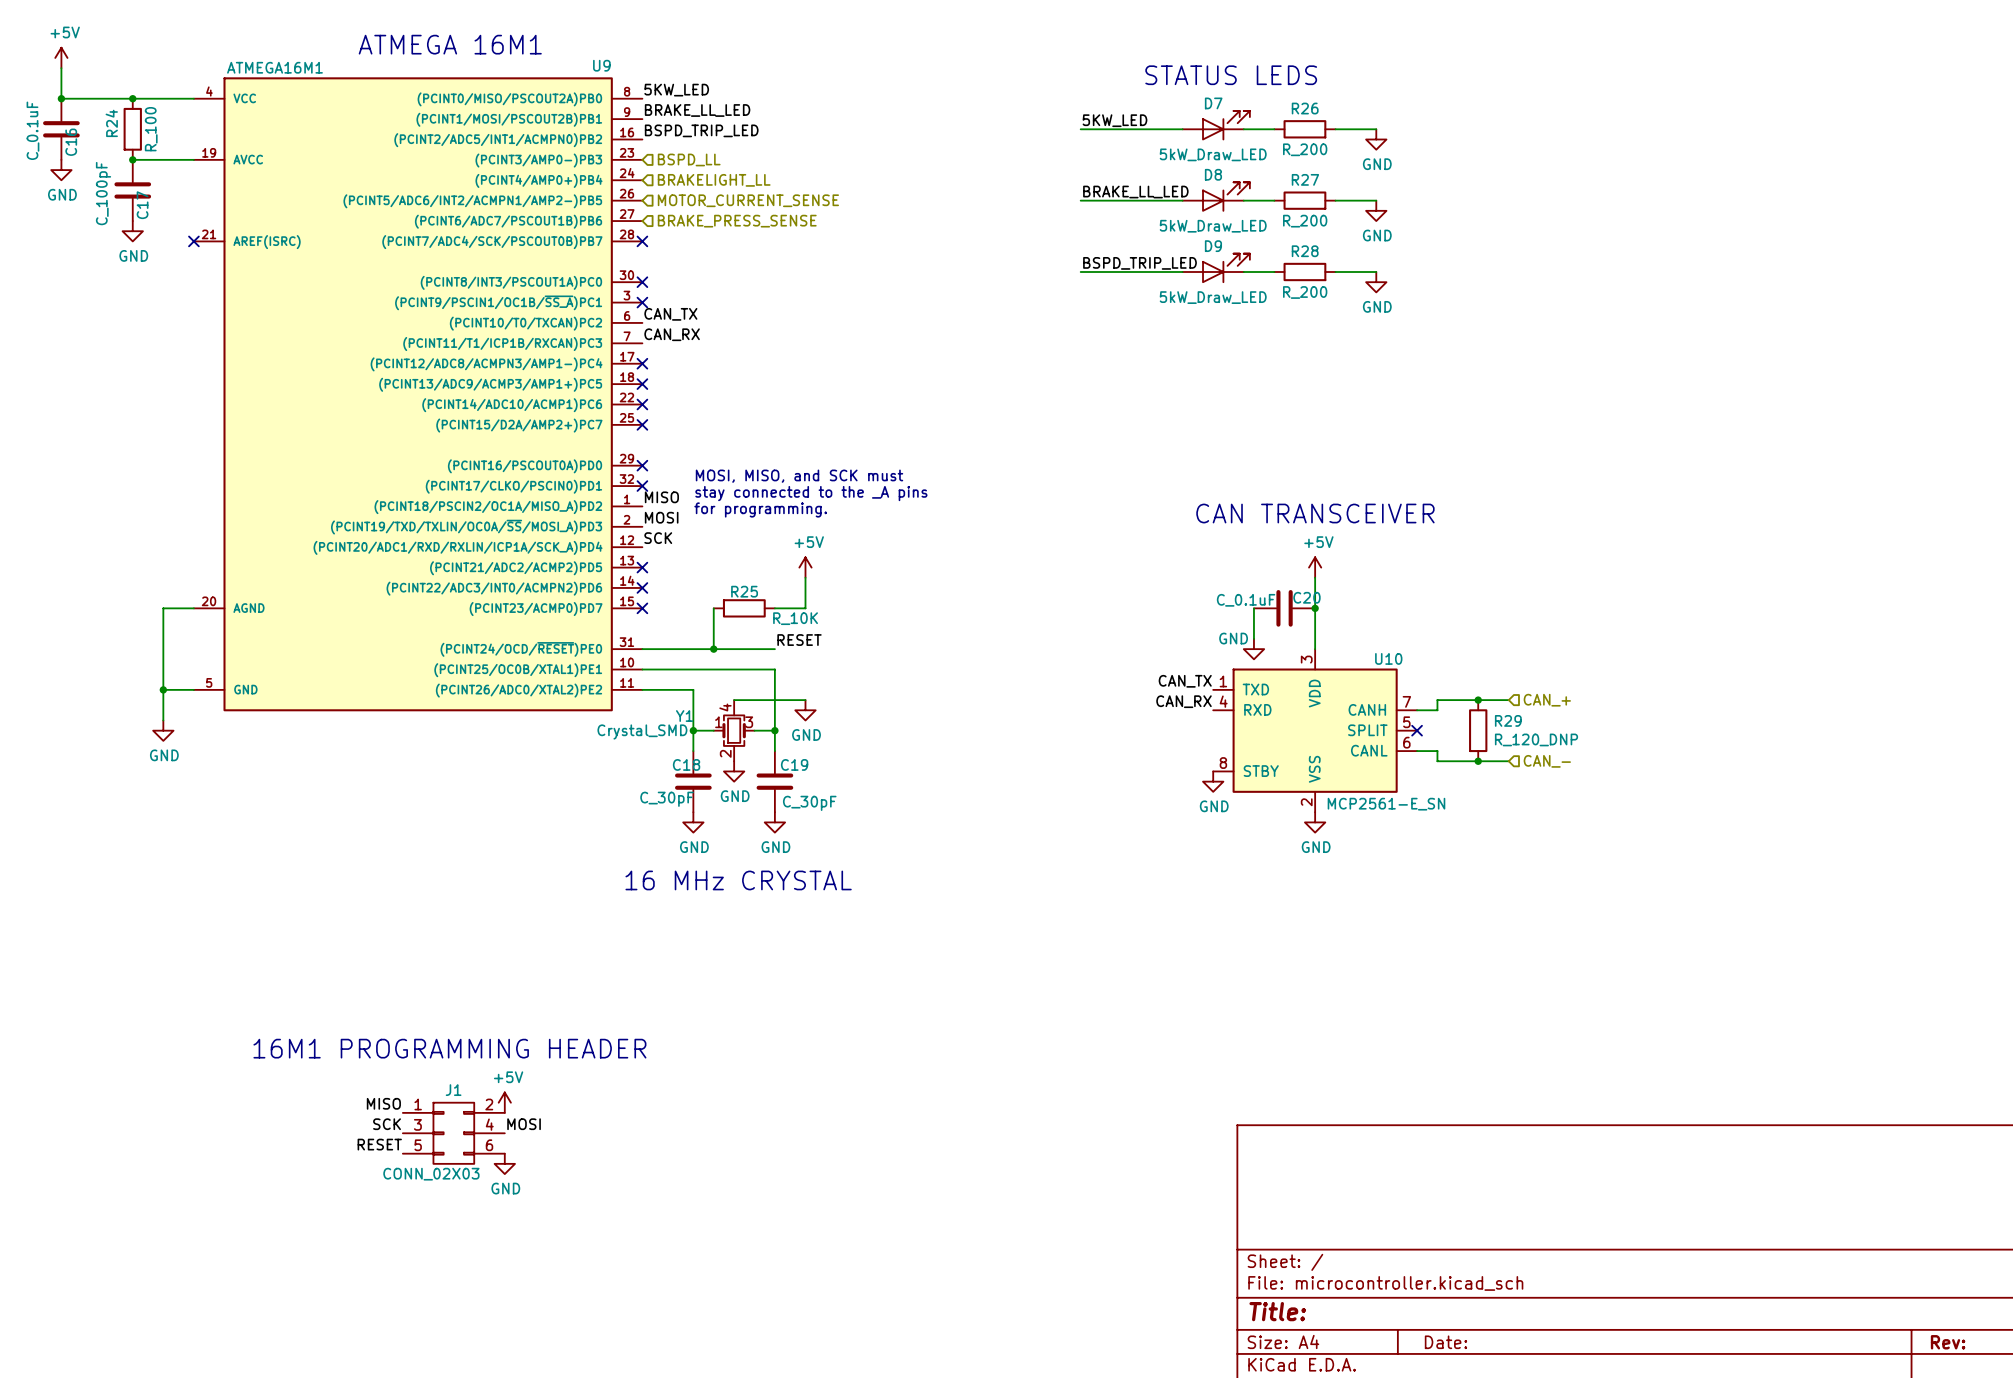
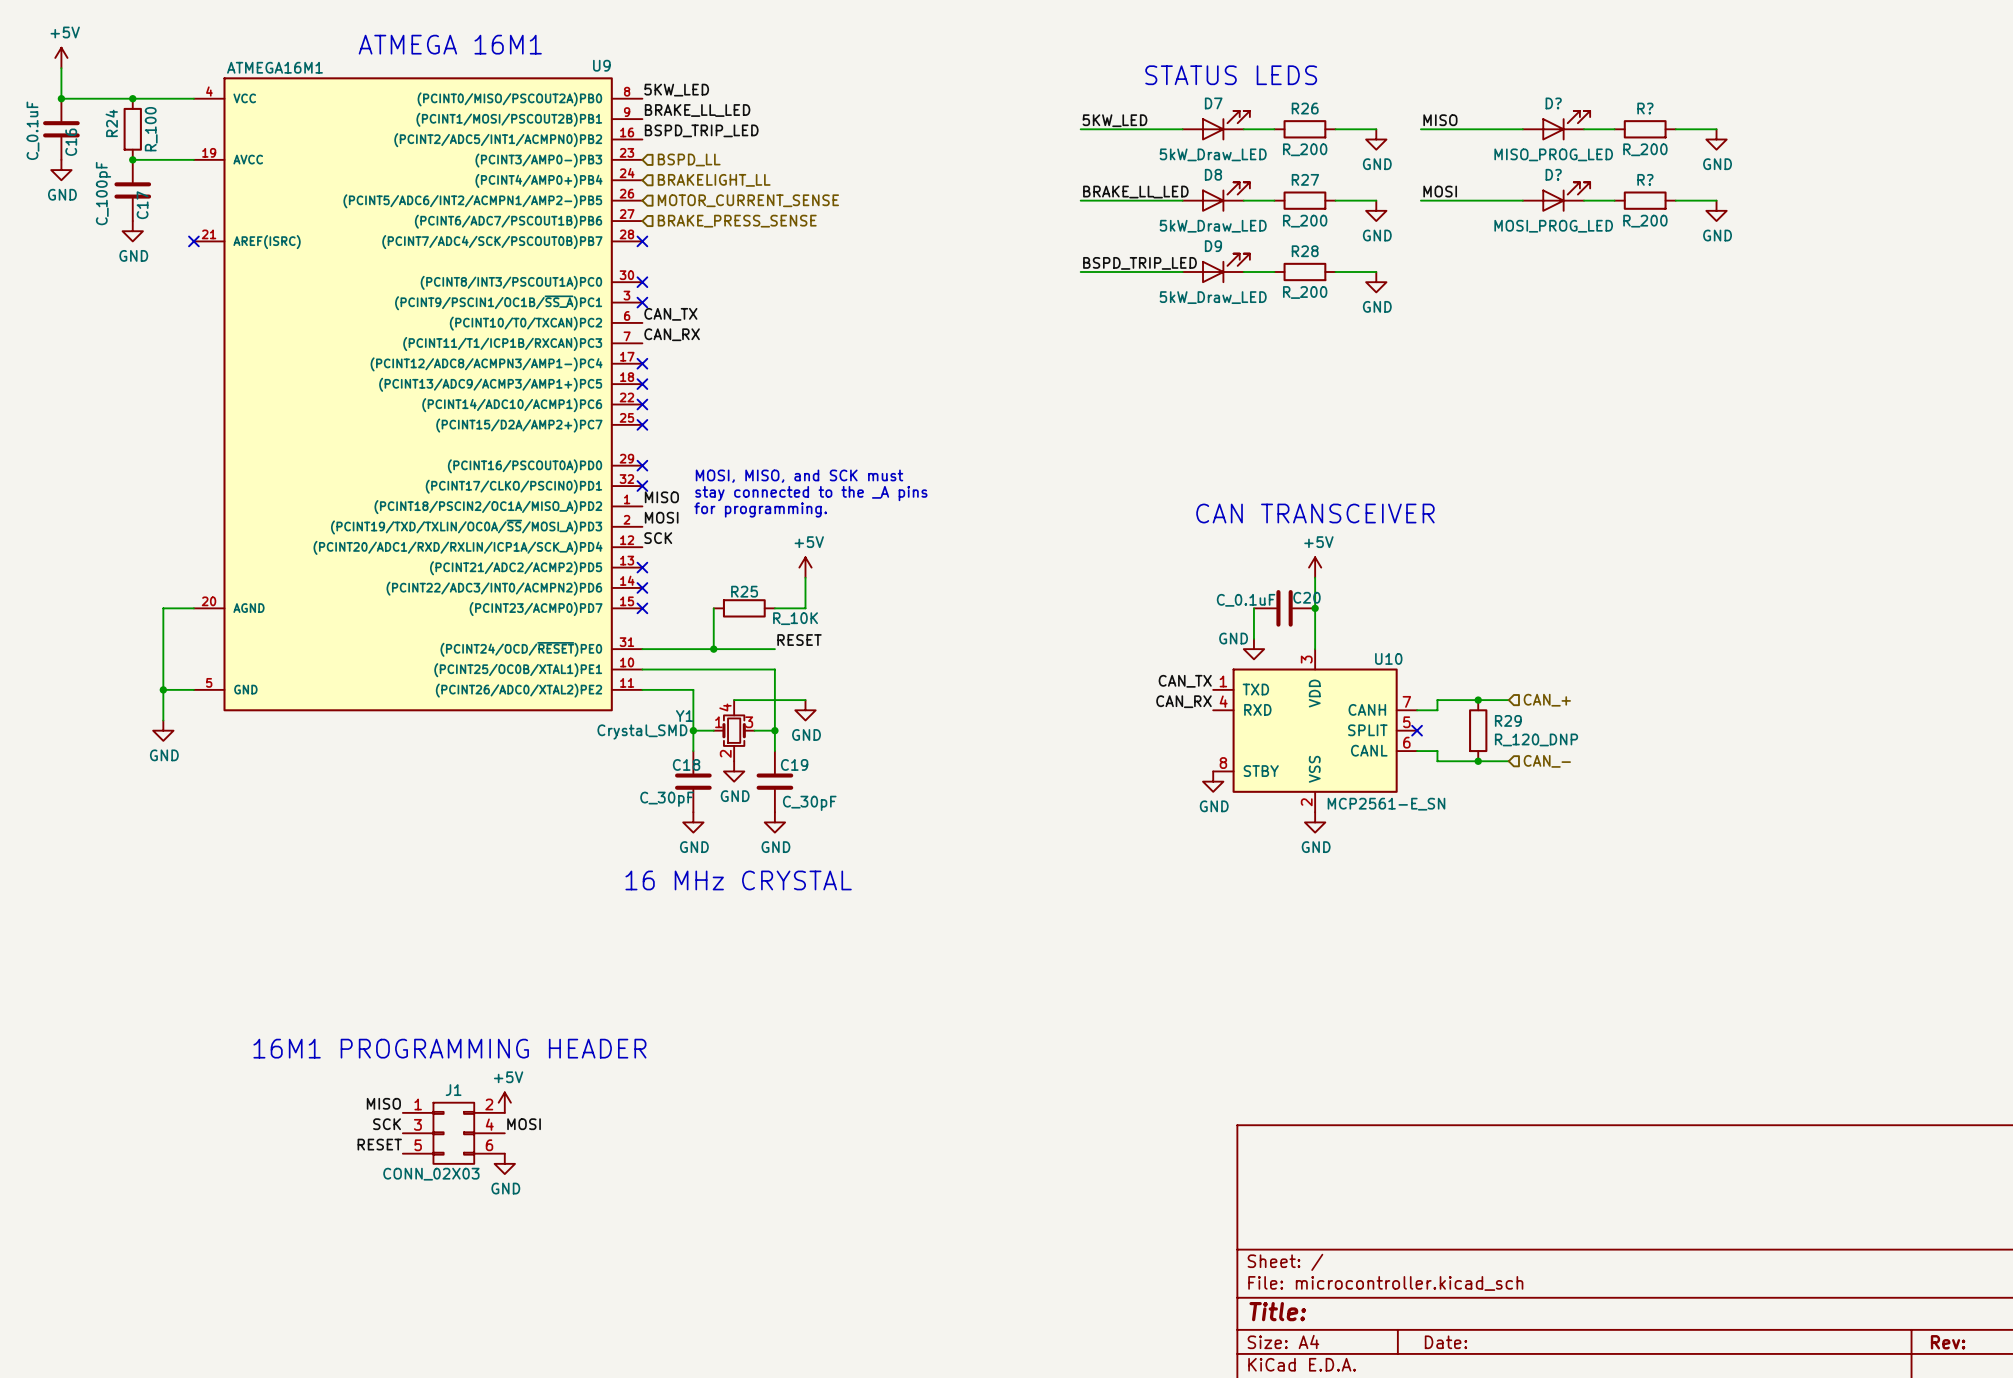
label: none -> MISO (1440, 120)
D?: none -> MISO_PROG_LED (1556, 125)
wire: none -> (1420, 129) (1522, 129)
wire: none -> (1584, 129) (1614, 129)
R?: none -> R_200 (1645, 129)
wire: none -> (1675, 129) (1716, 129)
power symbol: none -> GND (1716, 139)
label: none -> MOSI (1440, 191)
D?: none -> MOSI_PROG_LED (1556, 196)
wire: none -> (1420, 200) (1522, 200)
wire: none -> (1584, 200) (1614, 200)
R?: none -> R_200 (1645, 200)
wire: none -> (1675, 200) (1716, 200)
power symbol: none -> GND (1716, 210)

